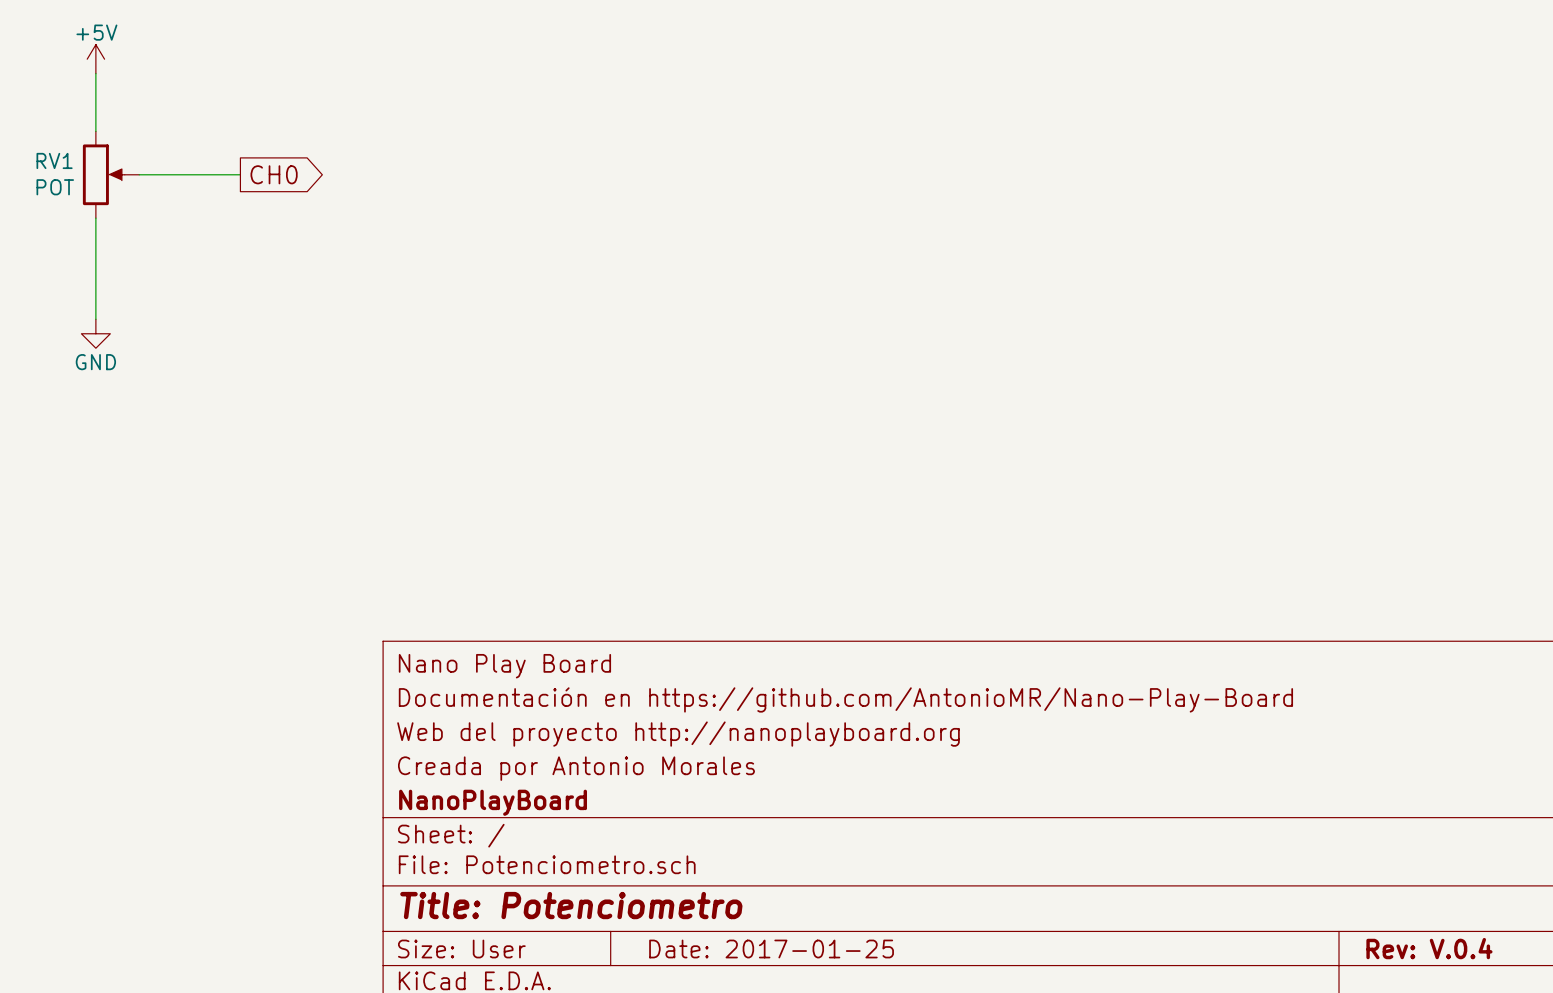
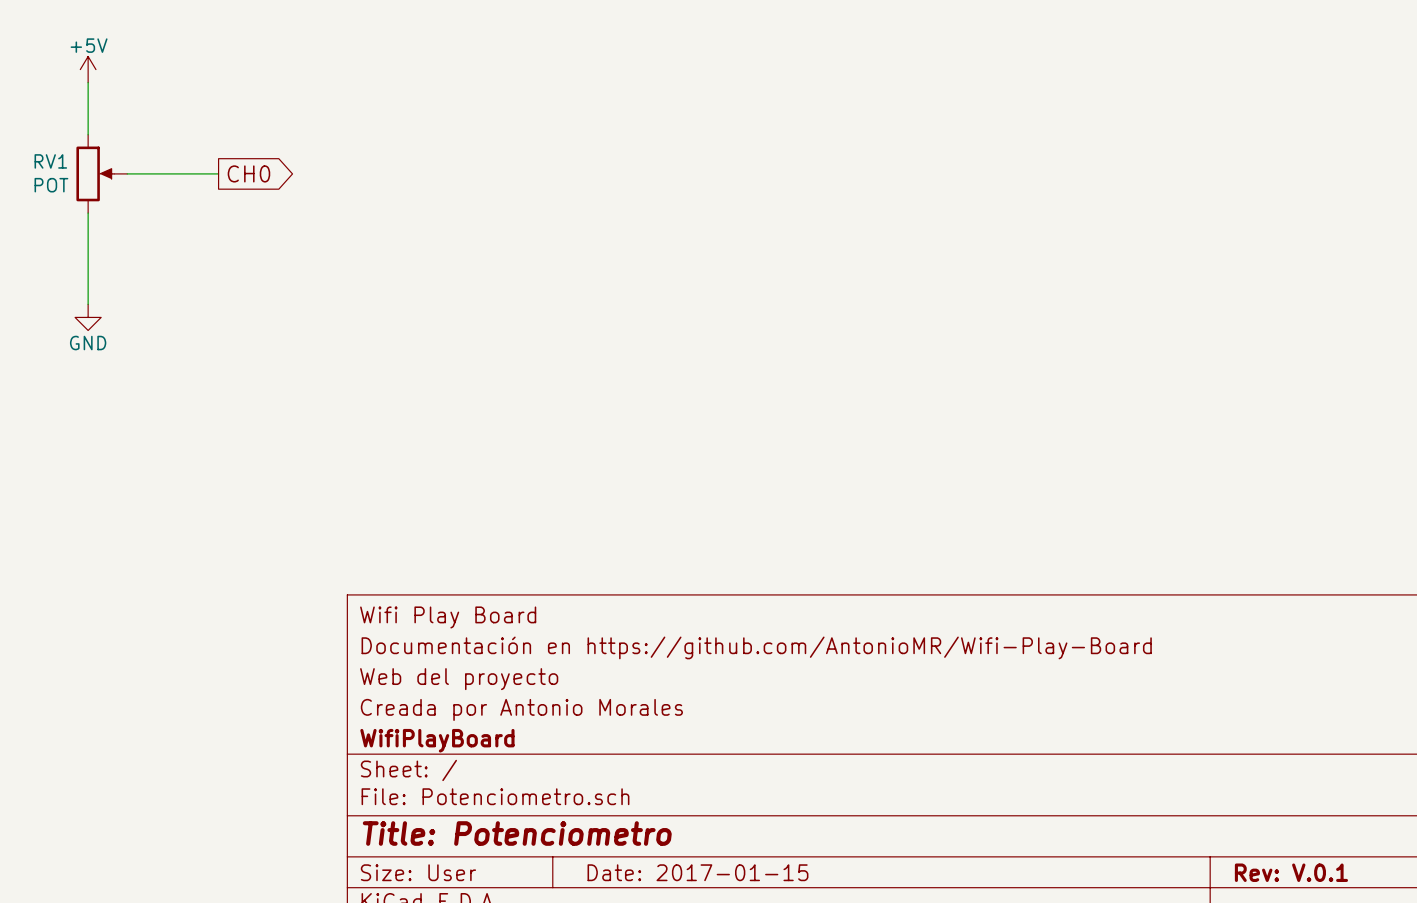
title block: Nano Play Board (504, 666) -> Wifi Play Board (448, 617)
title block: Documentación en https://github.com/AntonioMR/Nano-Play-Board (845, 699) -> Documentación en https://github.com/AntonioMR/Wifi-Play-Board (756, 647)
title block: Web del proyecto http://nanoplayboard.org (678, 734) -> Web del proyecto (459, 679)
title block: NanoPlayBoard (493, 802) -> WifiPlayBoard (437, 740)
title block: Rev: V.0.4 (1429, 948) -> Rev: V.0.1 (1291, 872)
title block: Date: 2017-01-25 (771, 949) -> Date: 2017-01-15 (697, 872)

